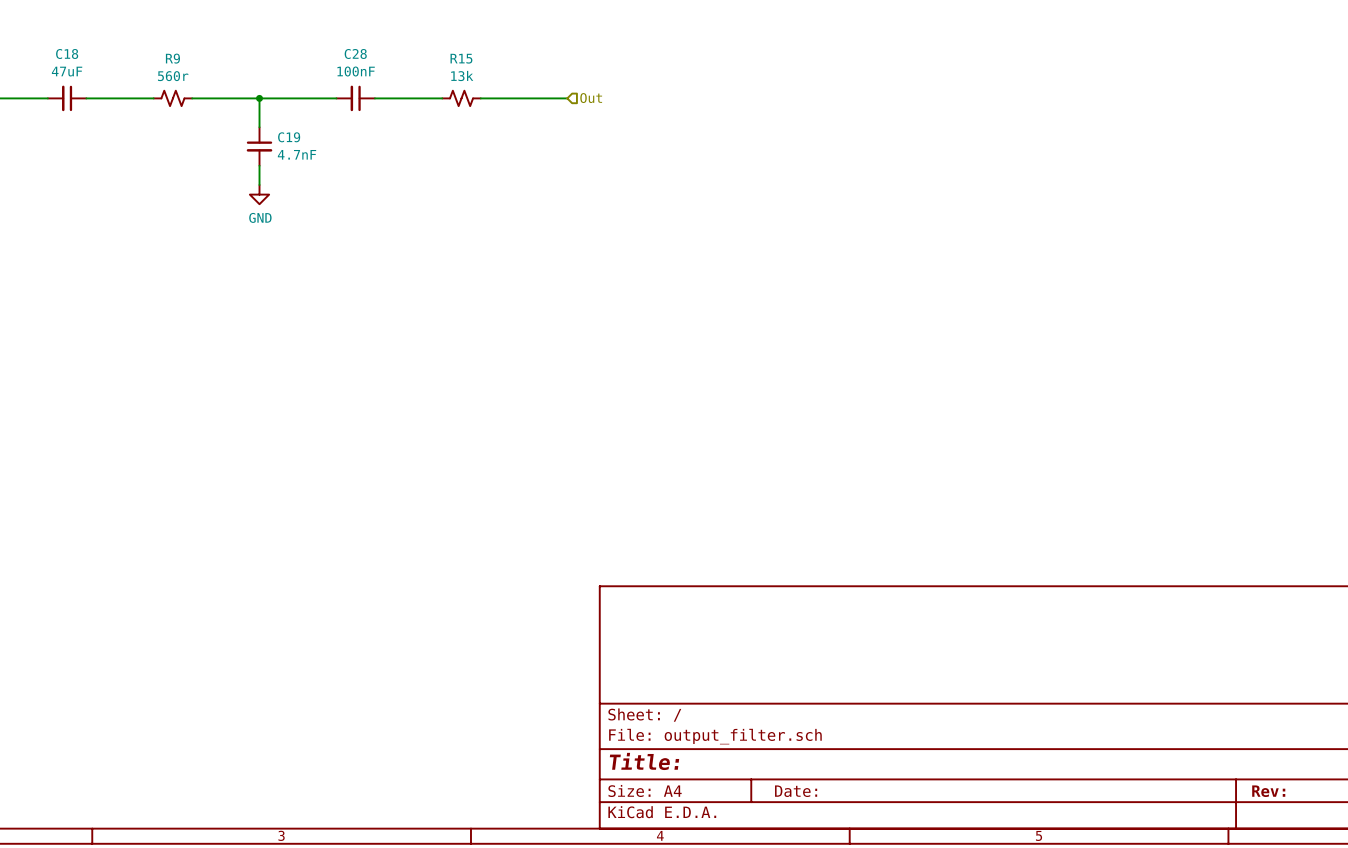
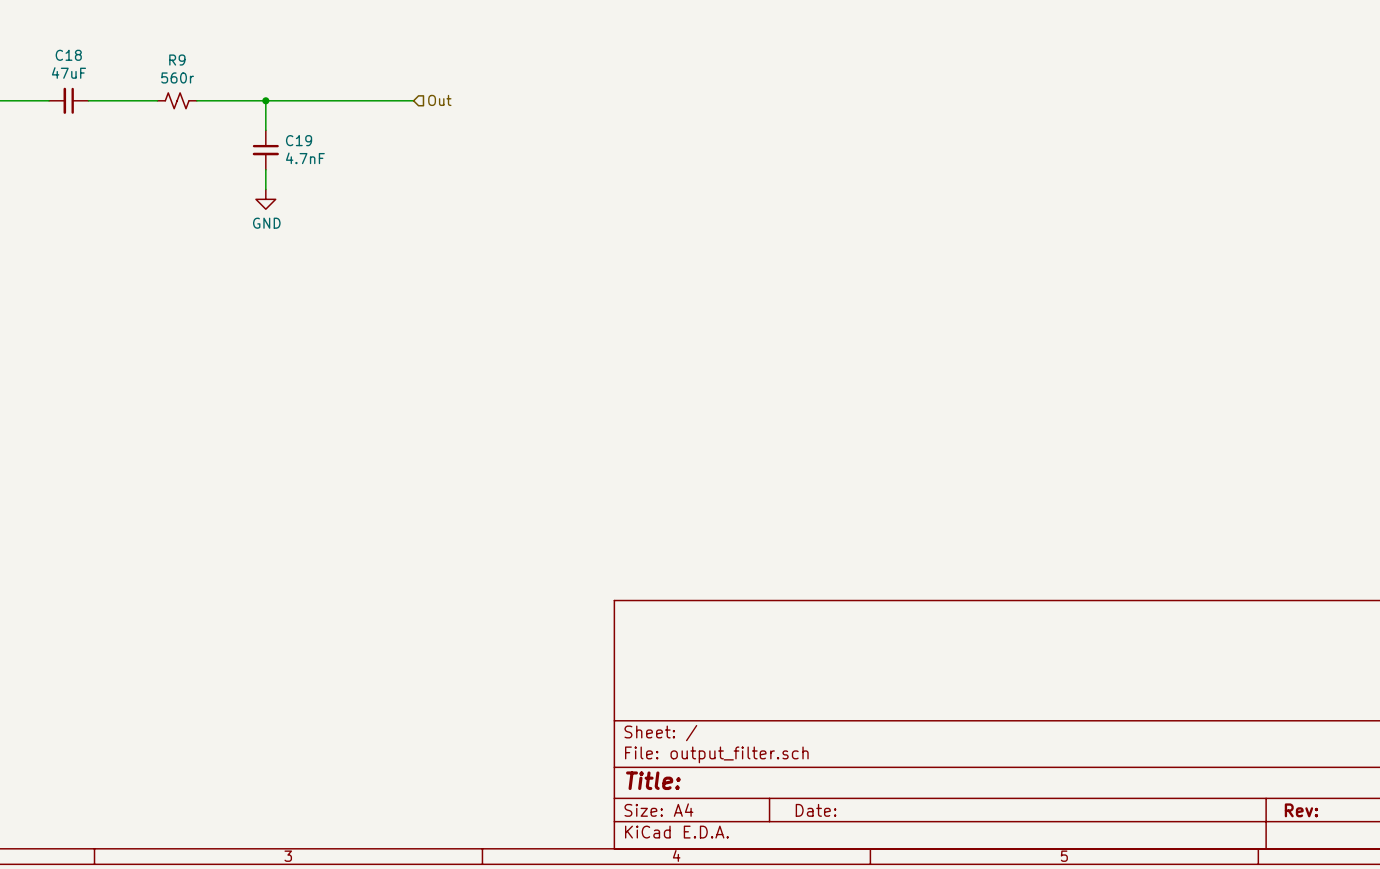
C28: 100nF (355, 98) -> none
R15: 13k (461, 98) -> none
wire: (480, 98) (567, 98) -> none
hierarchical label position: Out (591, 98) -> Out (439, 100)

